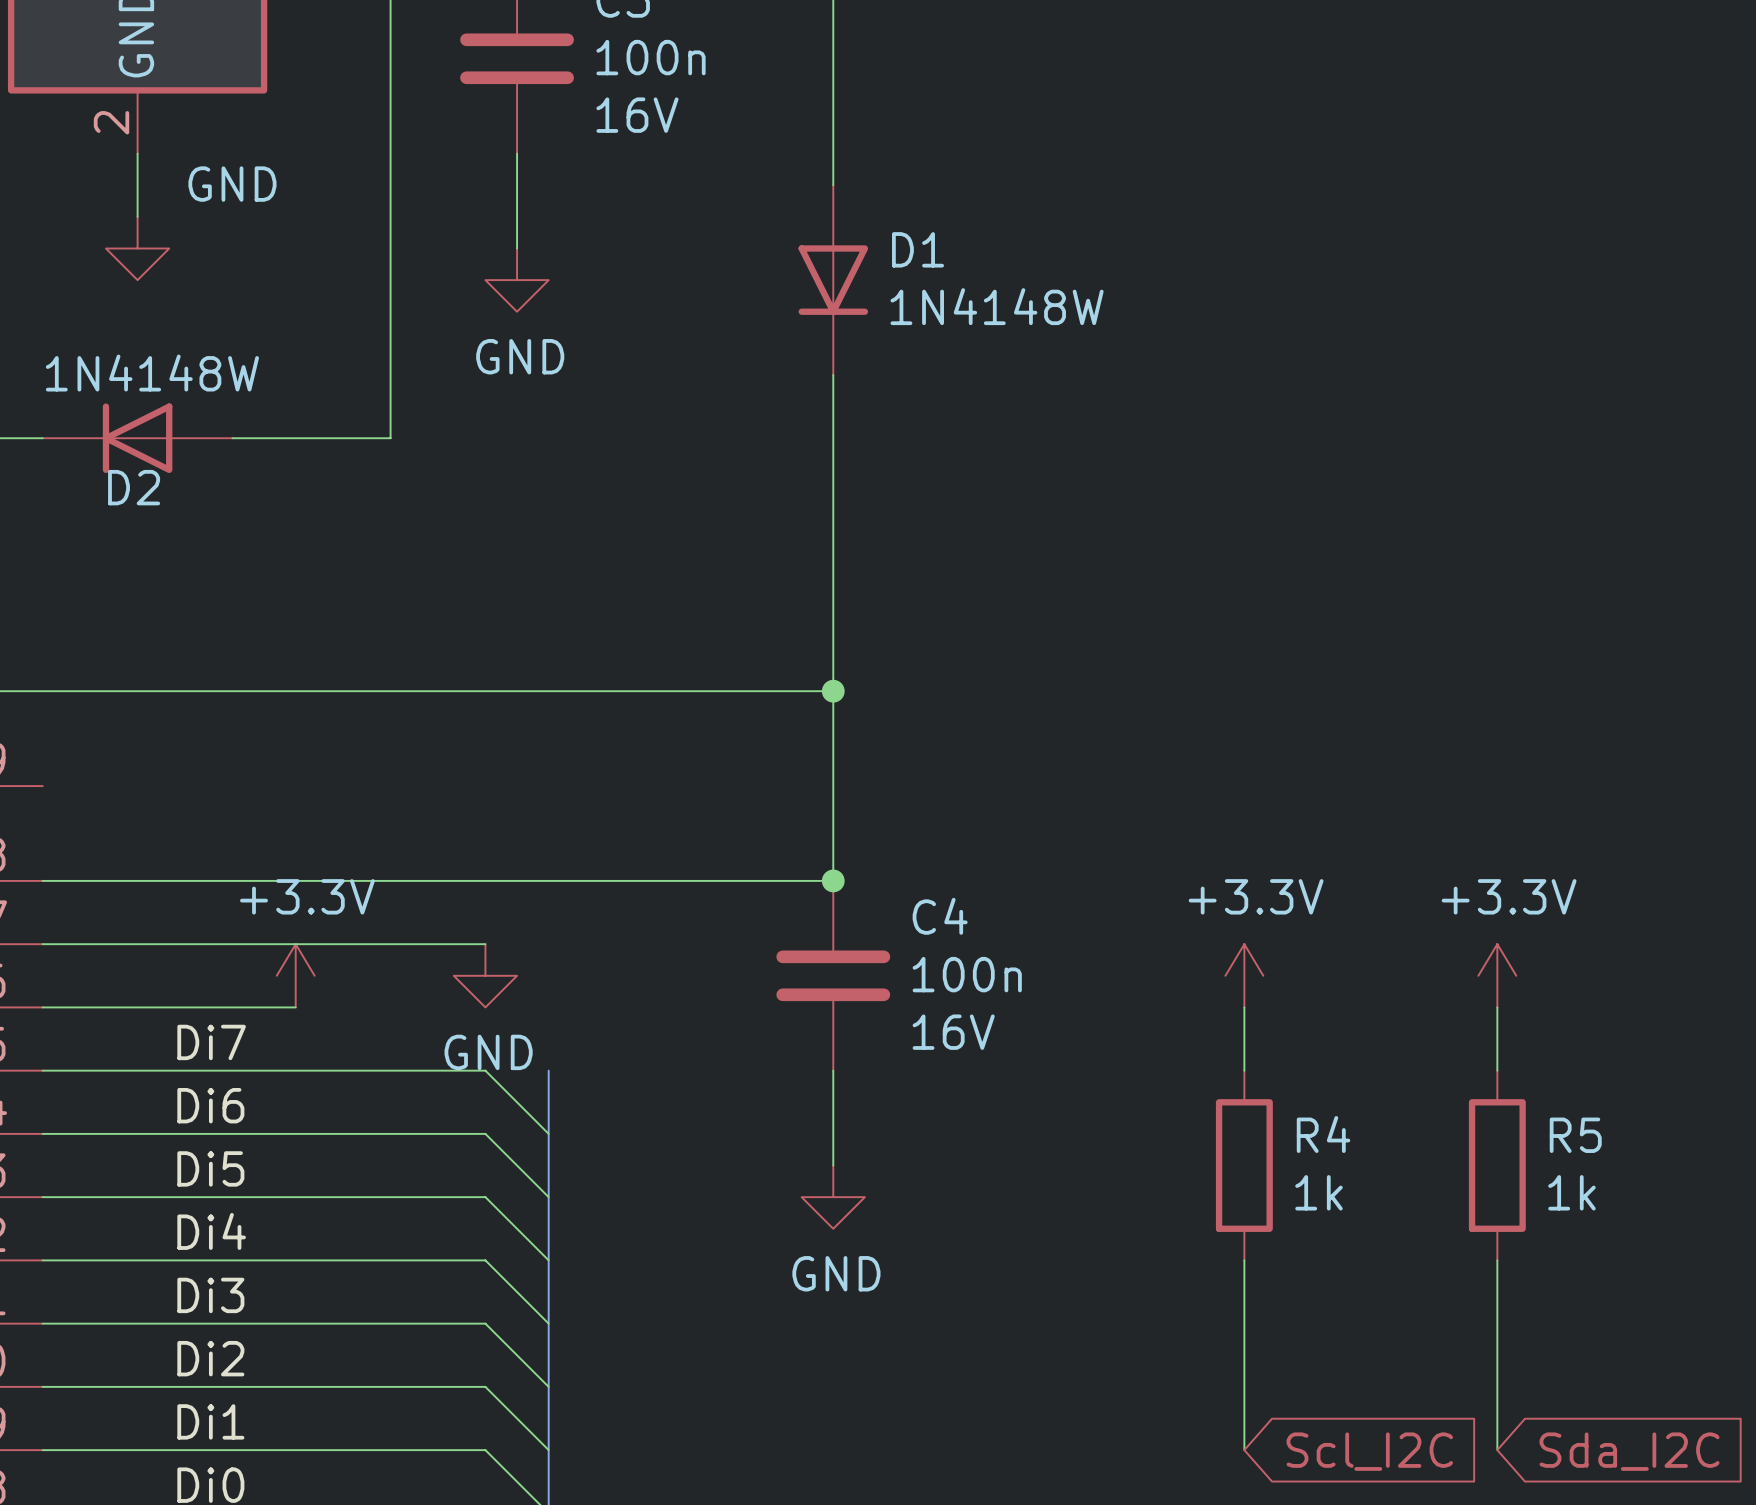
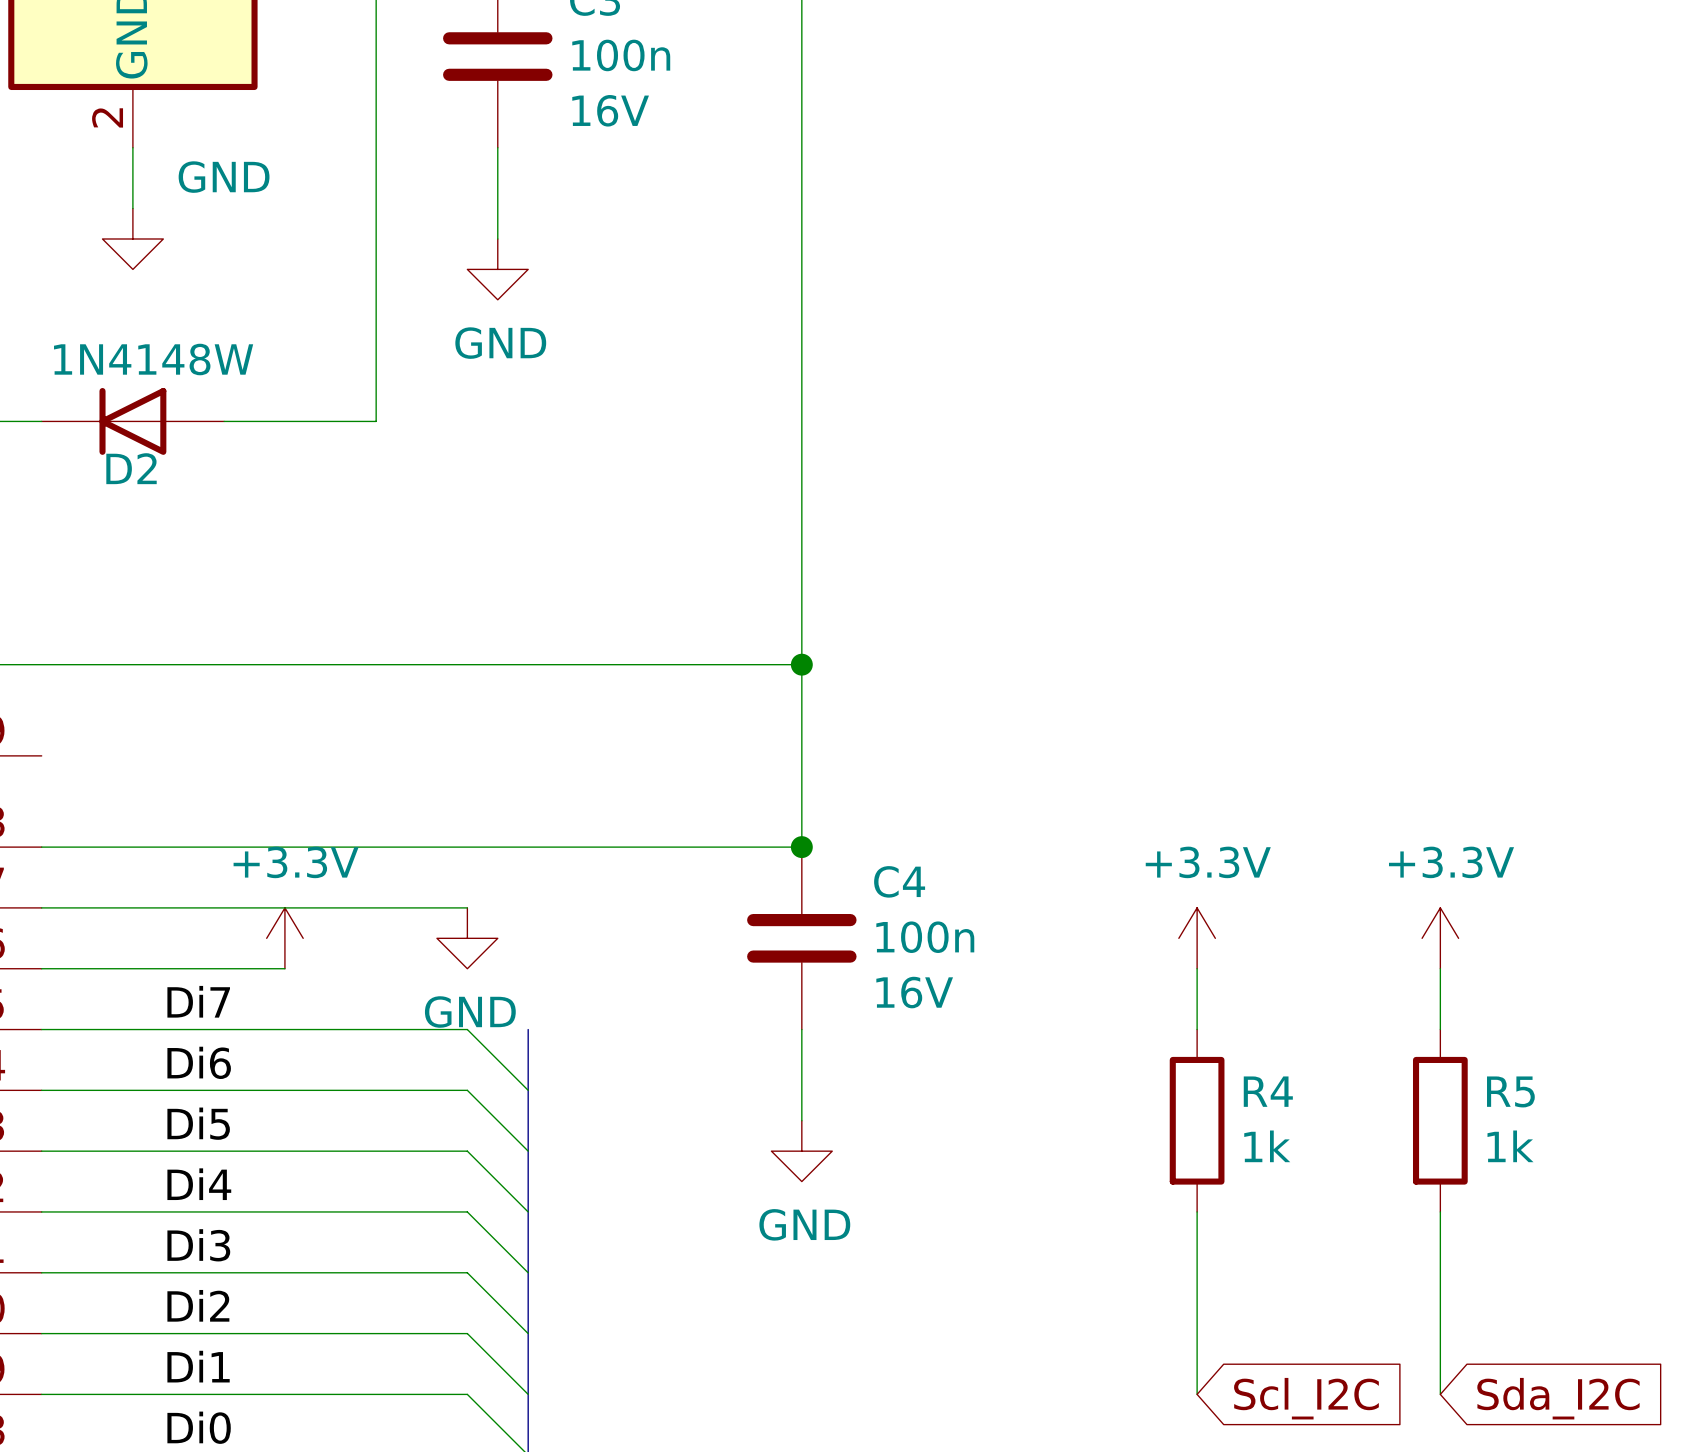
D1: 1N4148W (833, 280) -> none

